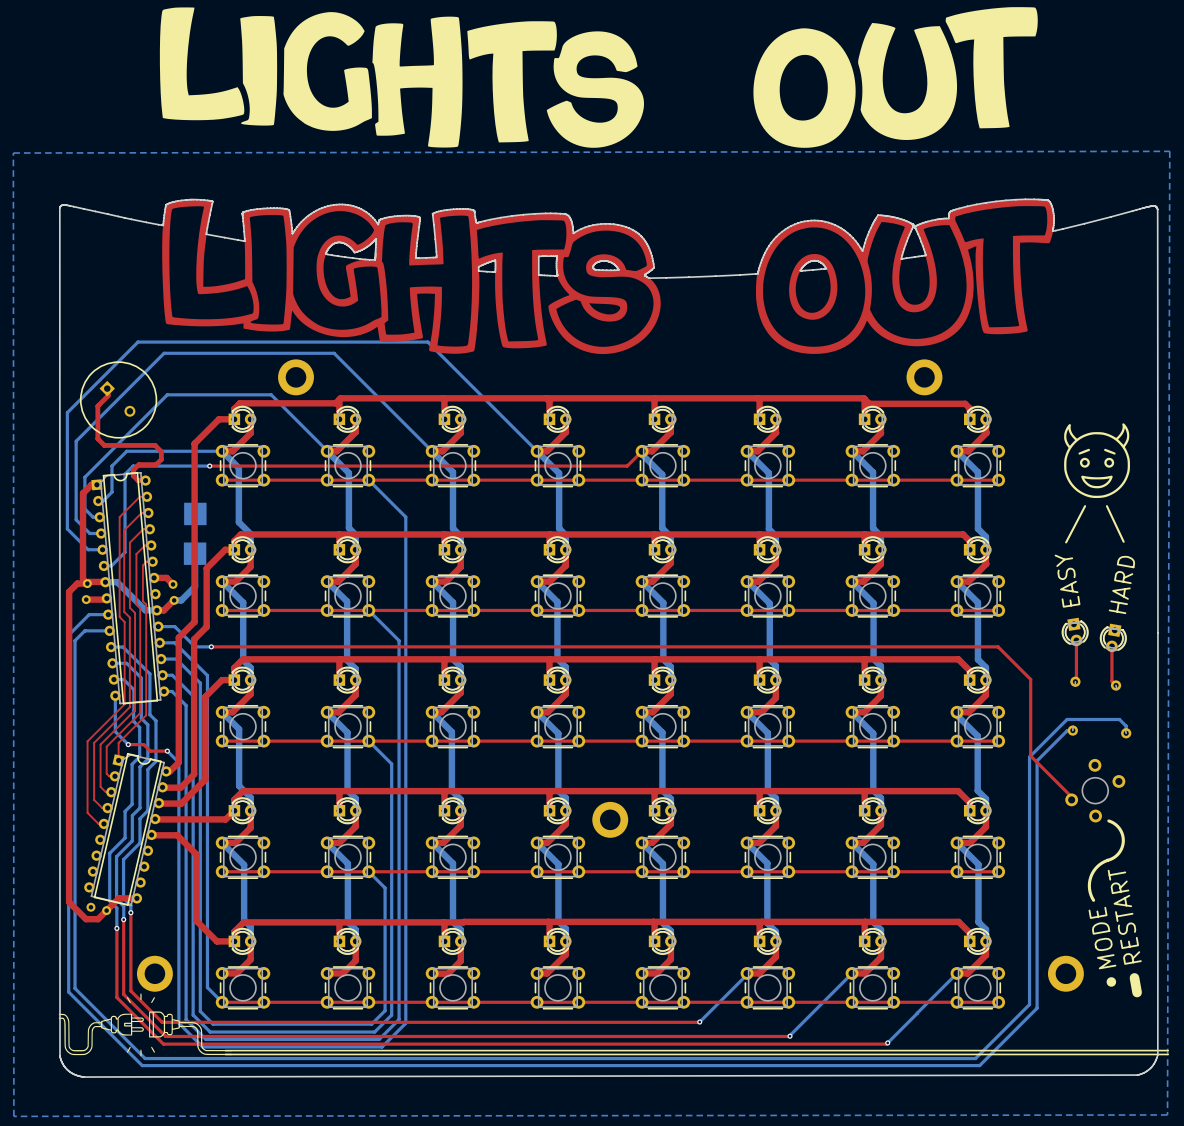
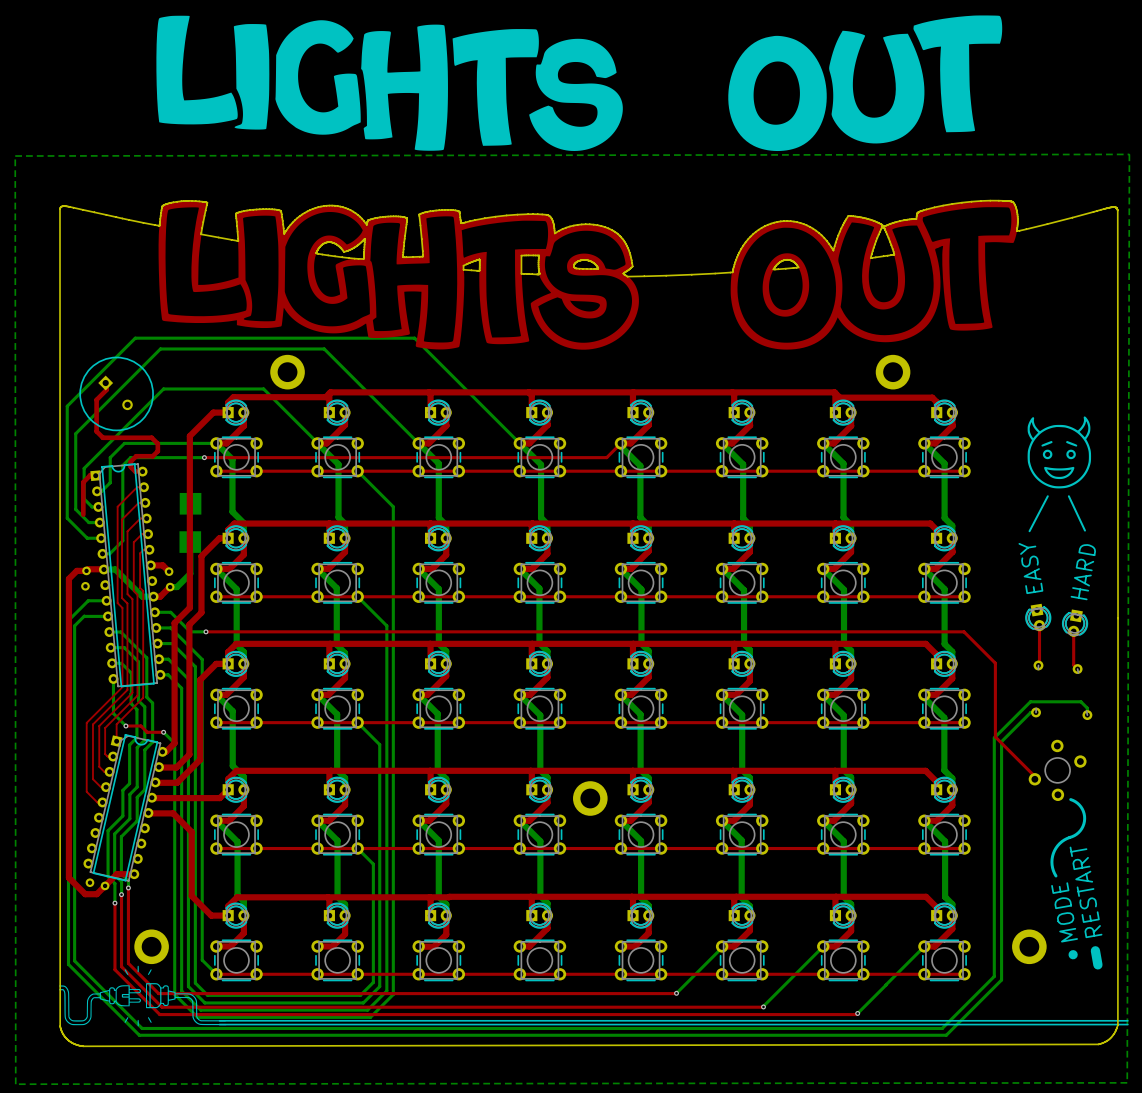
top track: (91, 484) (83, 493) (83, 579) (87, 583) -> (90, 475) (83, 482) (83, 514)
top track: (86, 599) (105, 599) -> none

